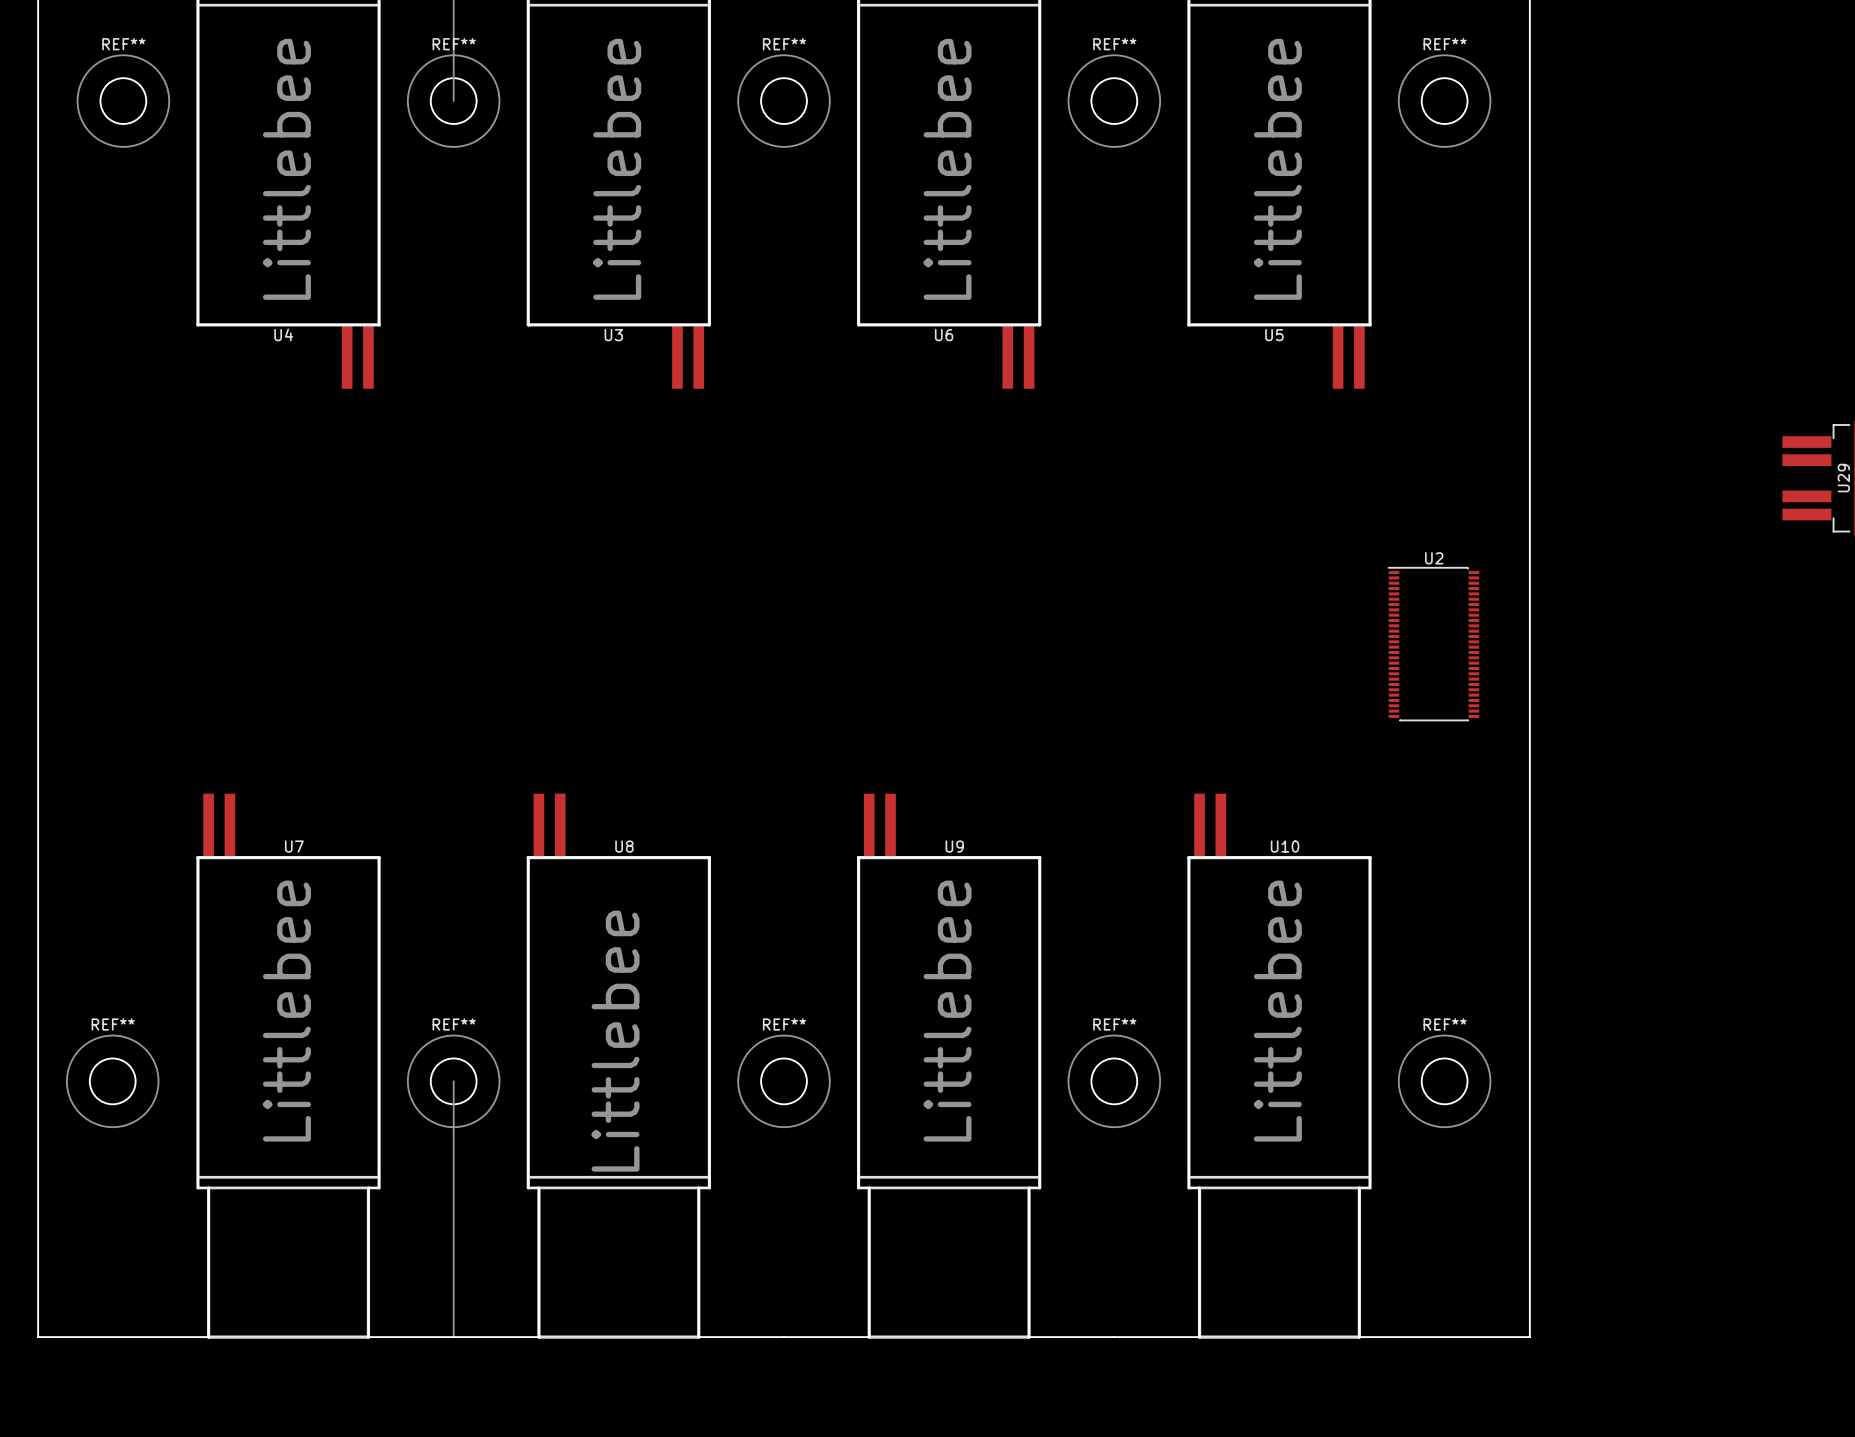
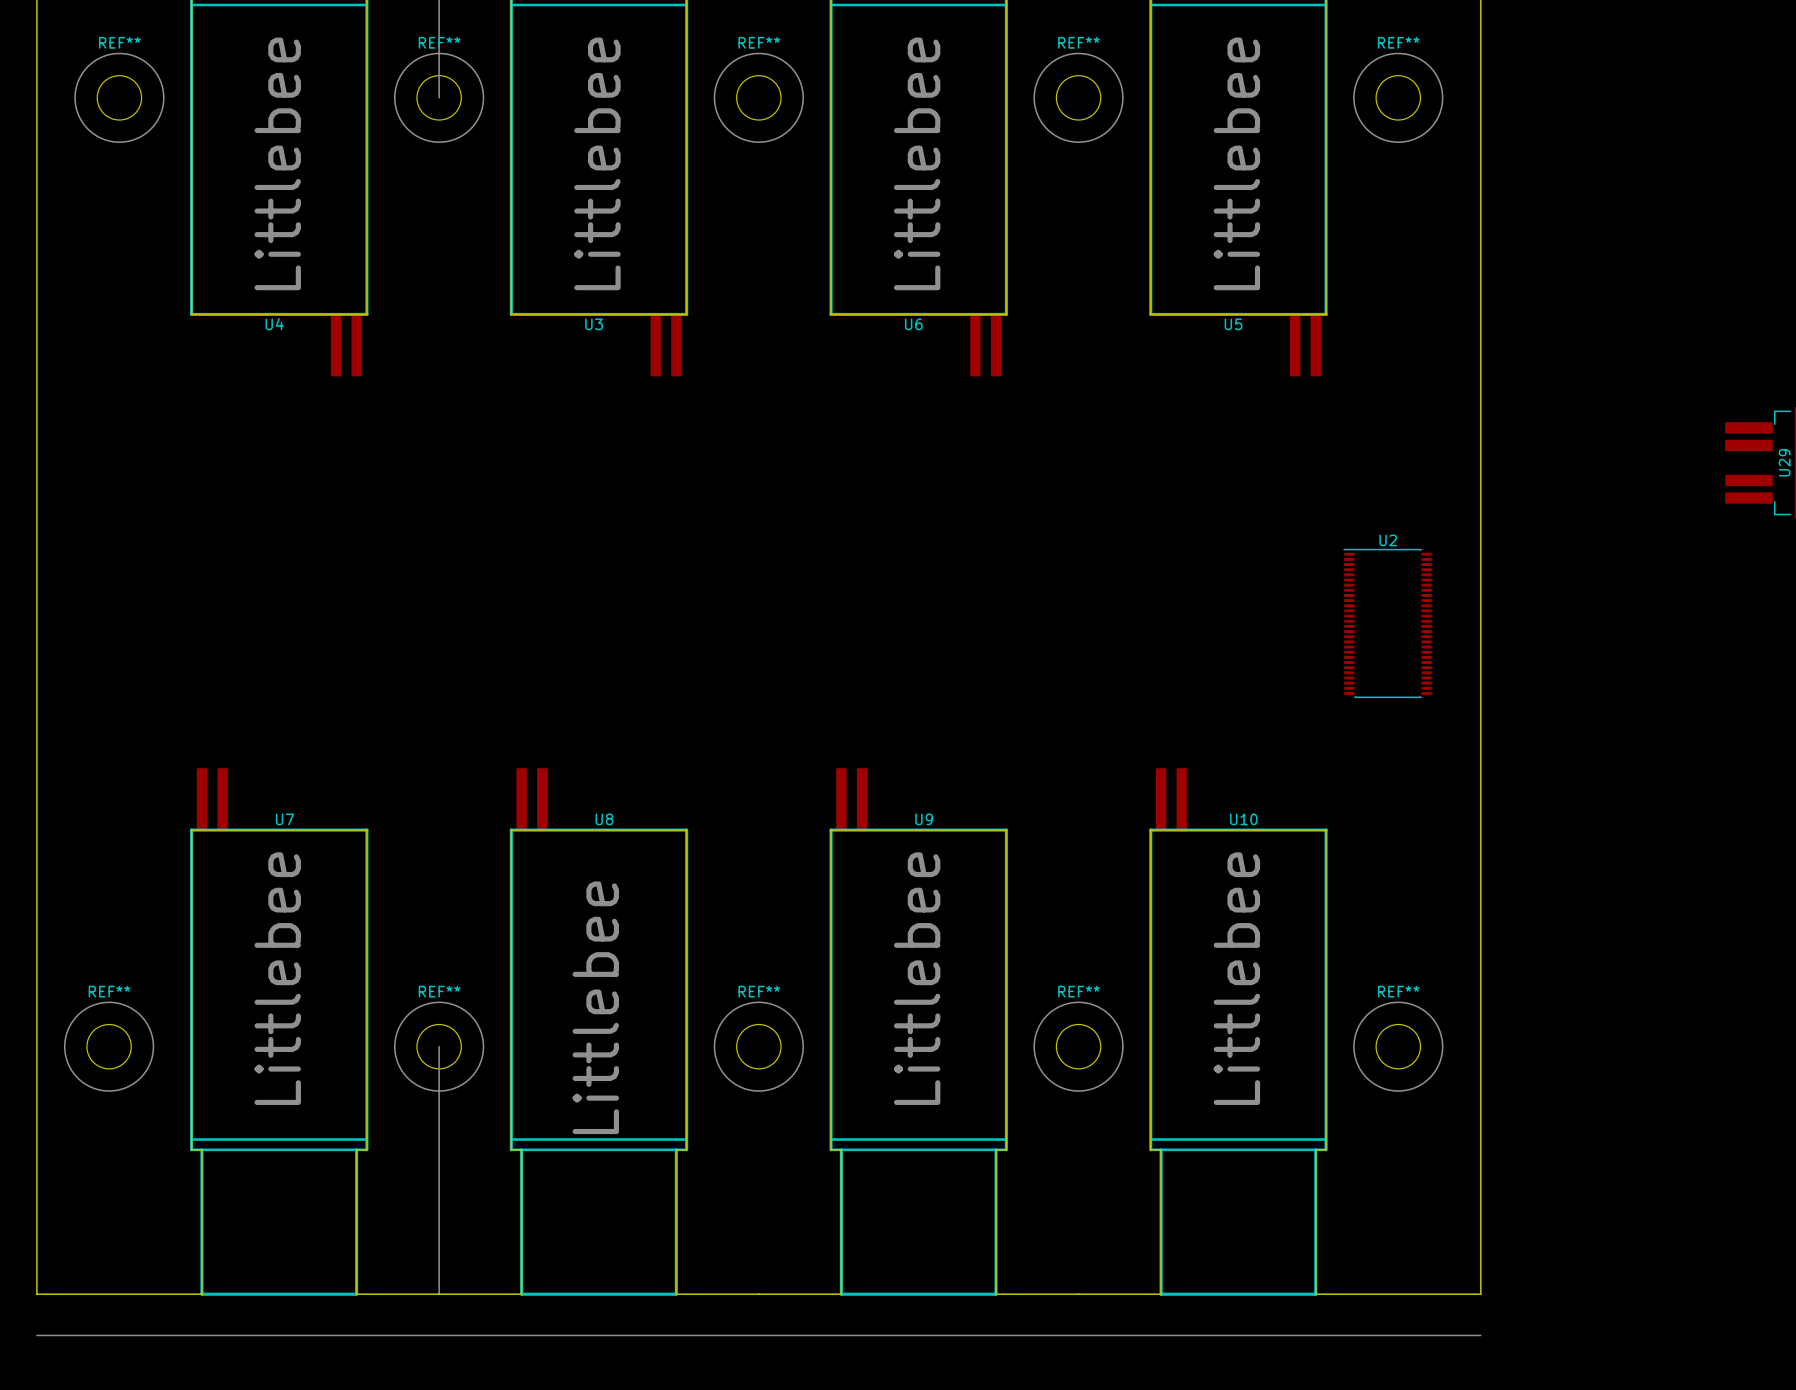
line: none -> (36, 1335) (1480, 1335)

